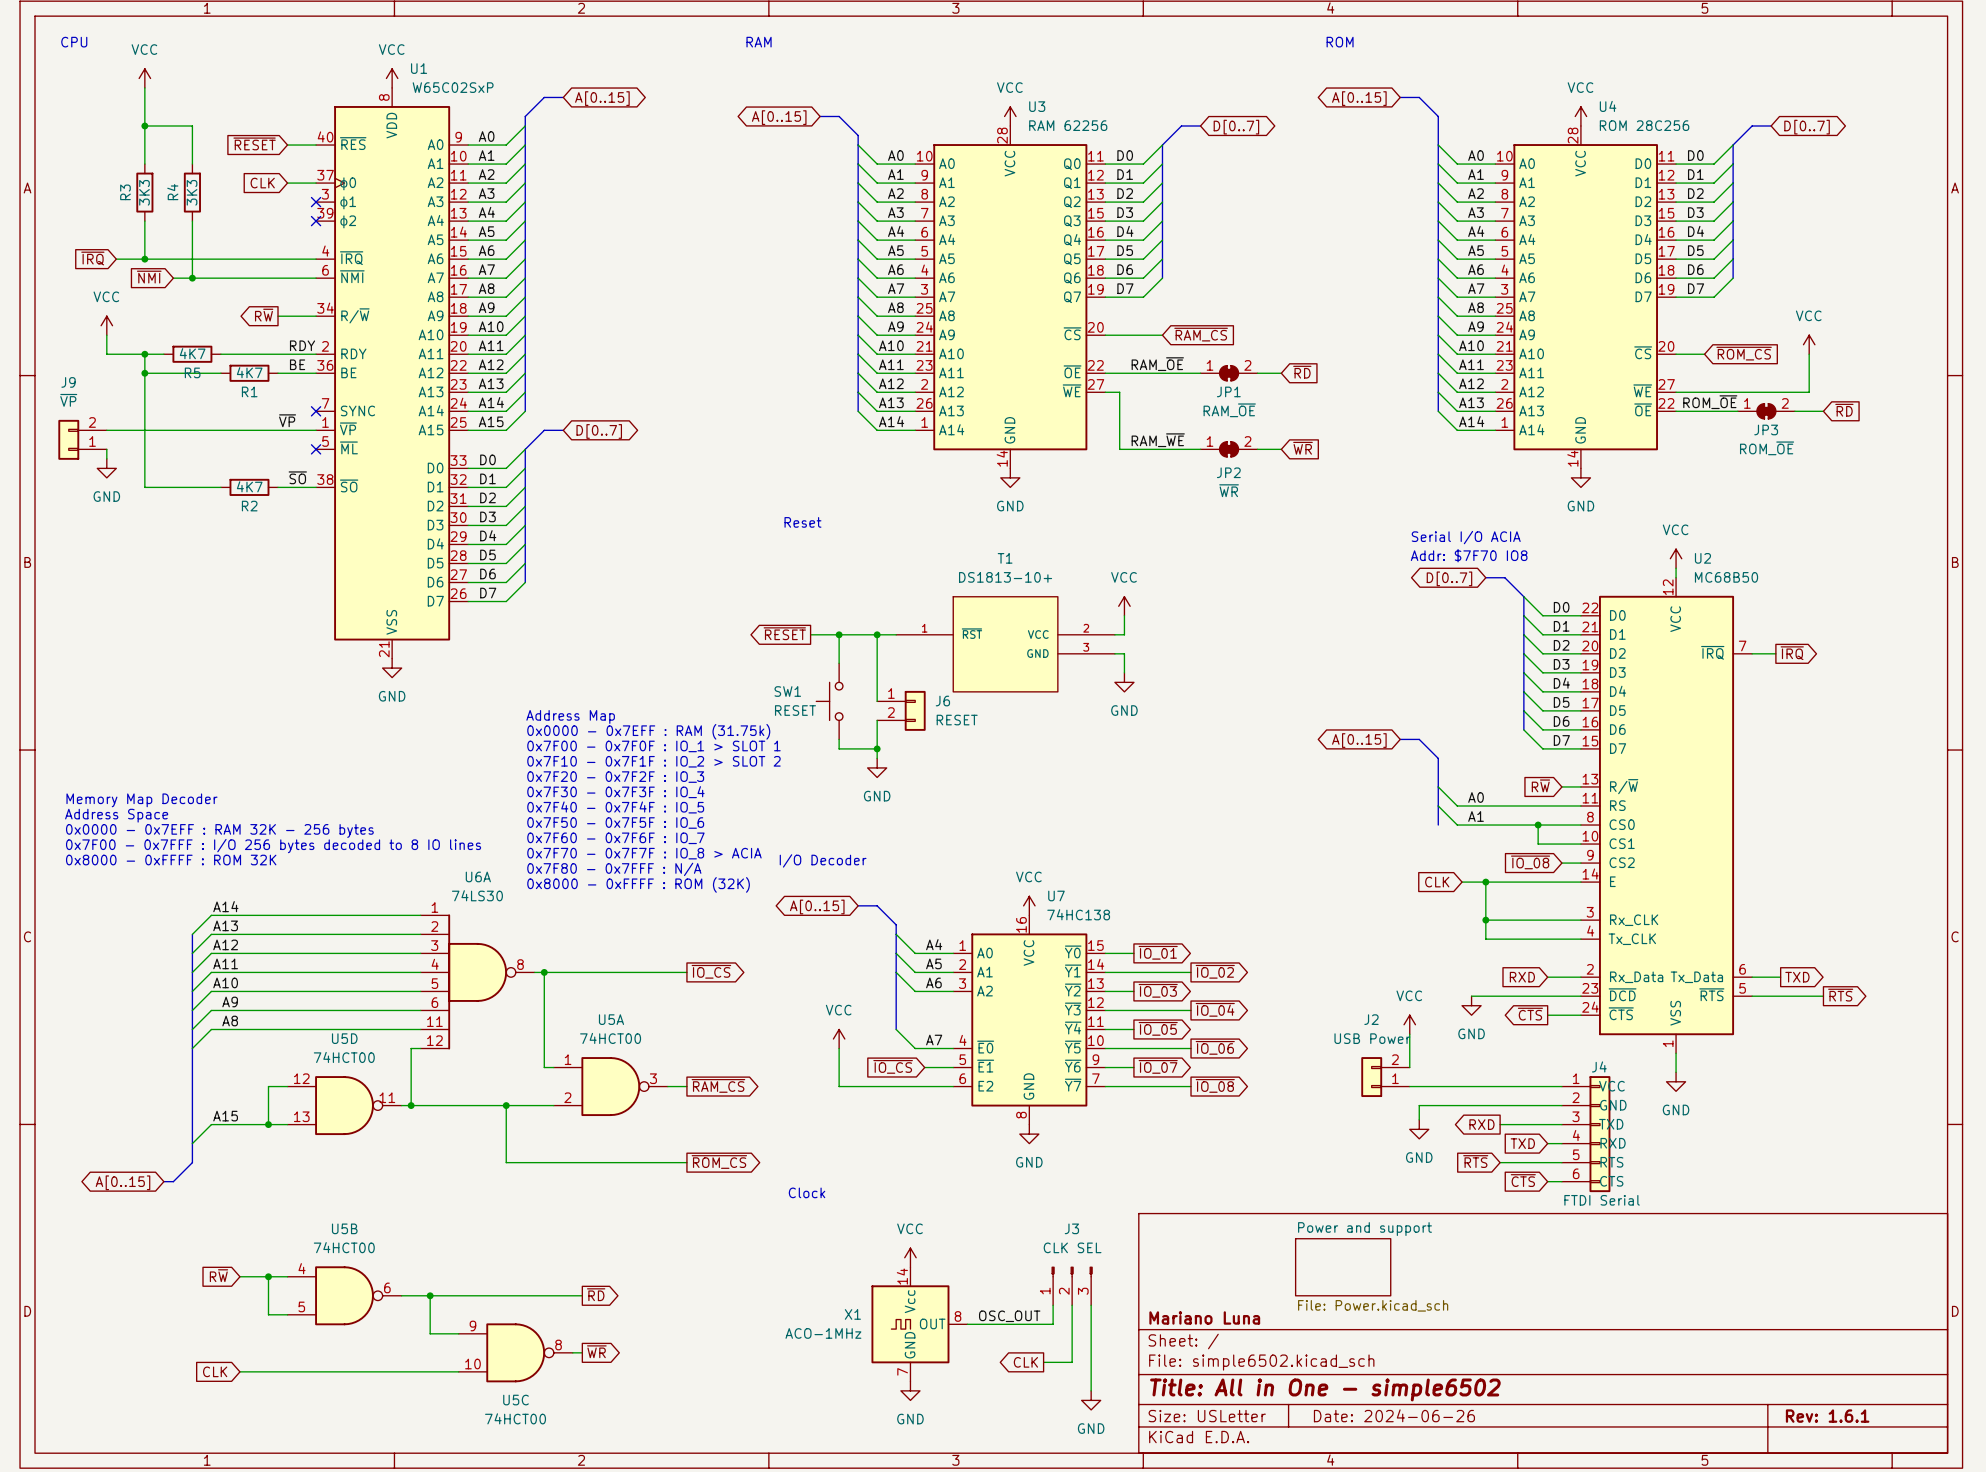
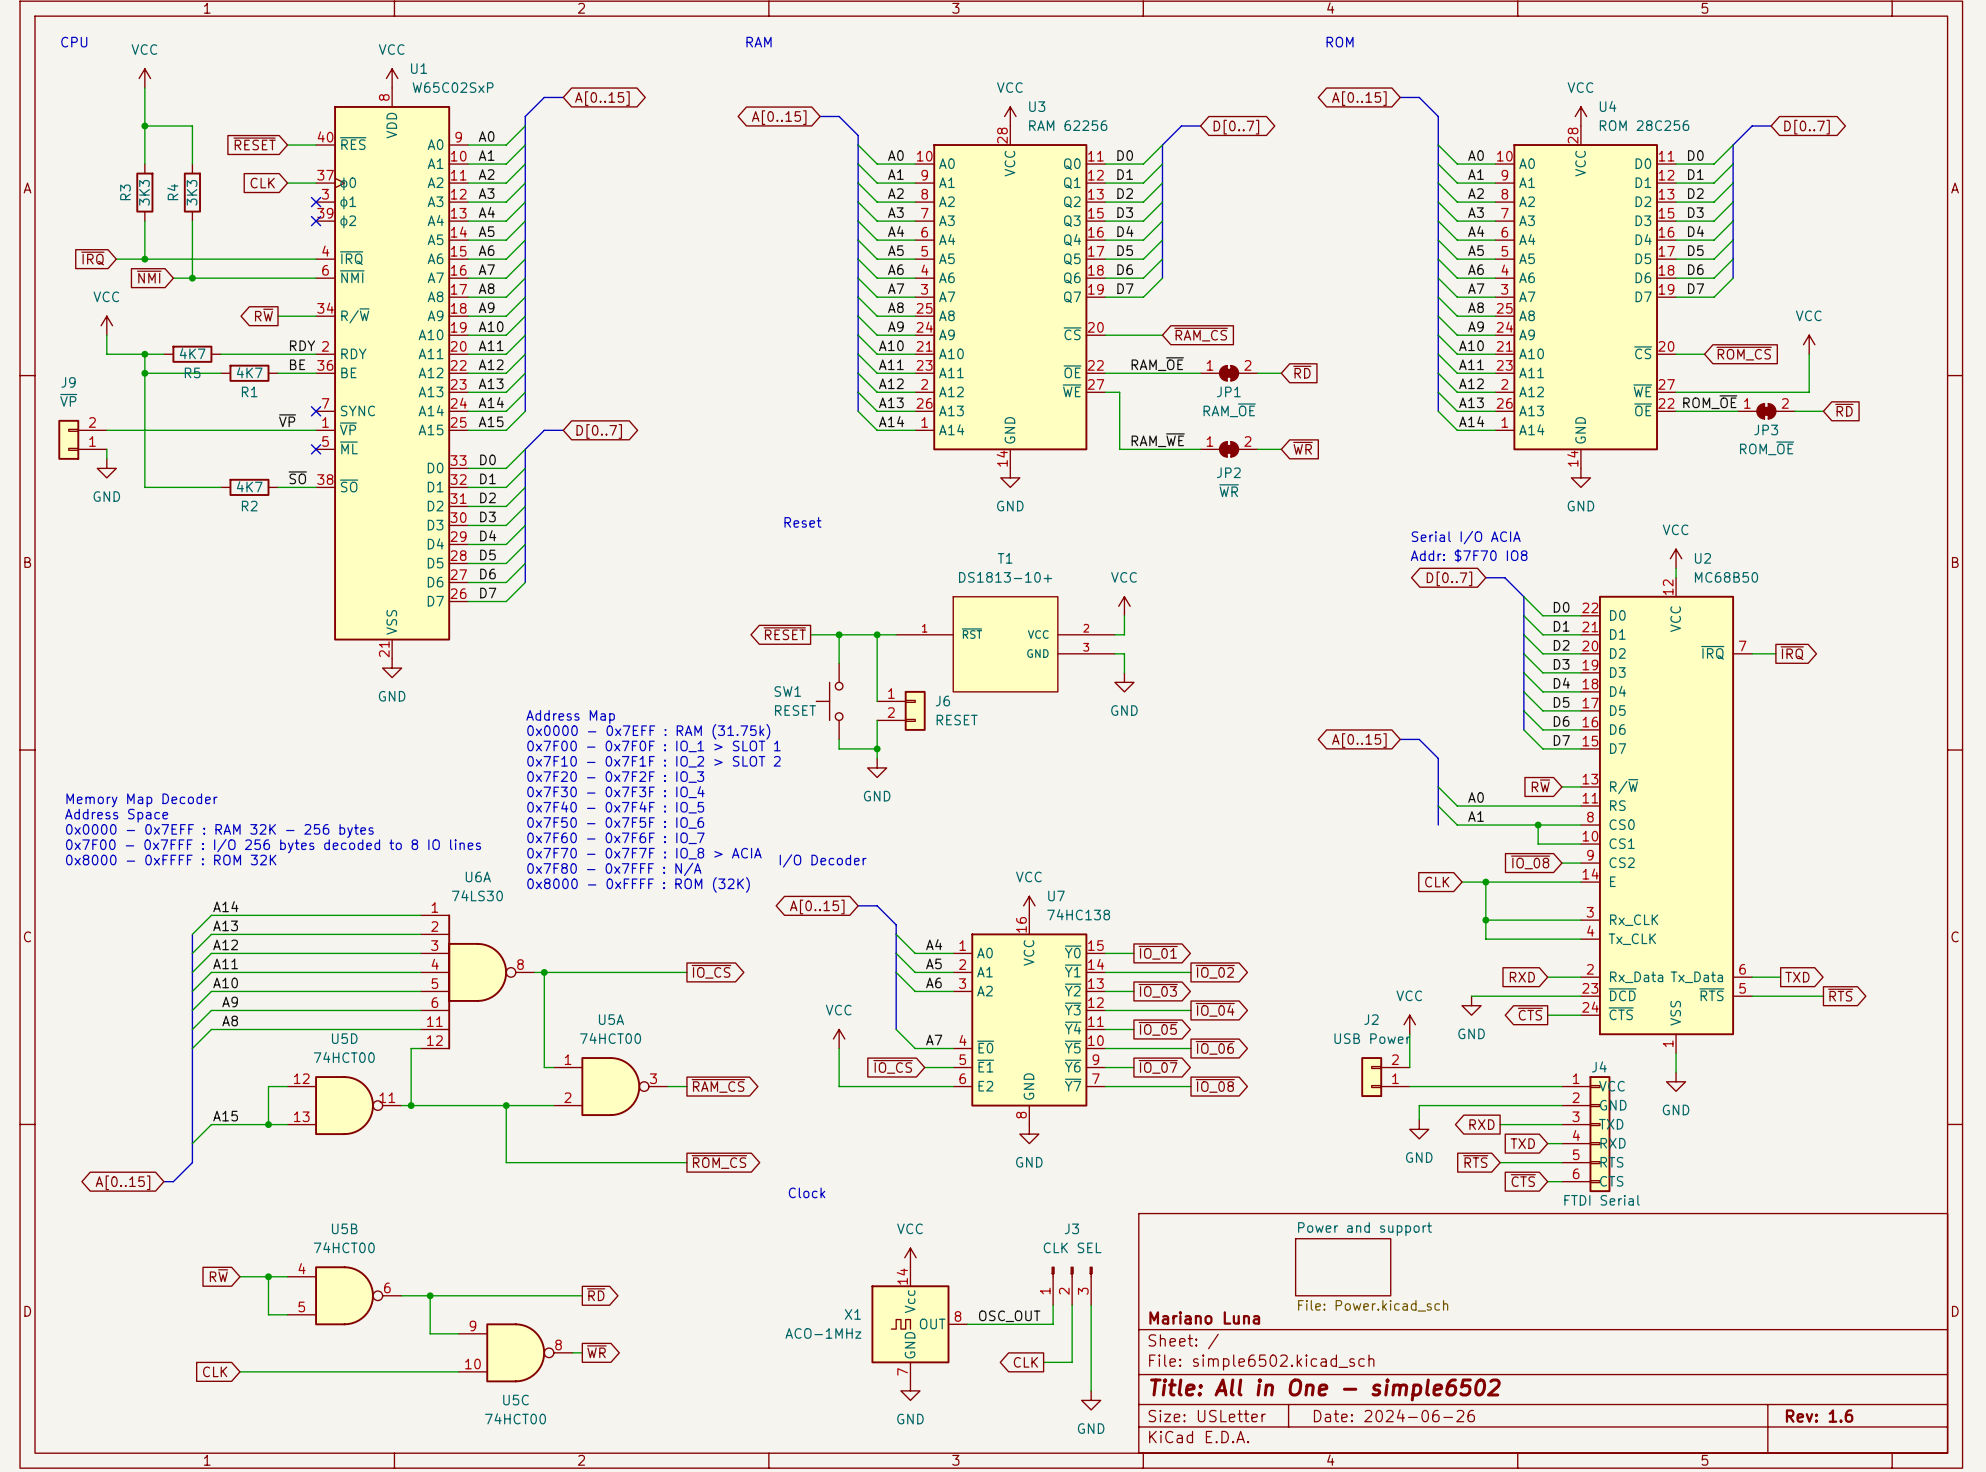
title block: Rev: 1.6.1 (1827, 1416) -> Rev: 1.6 (1819, 1416)

